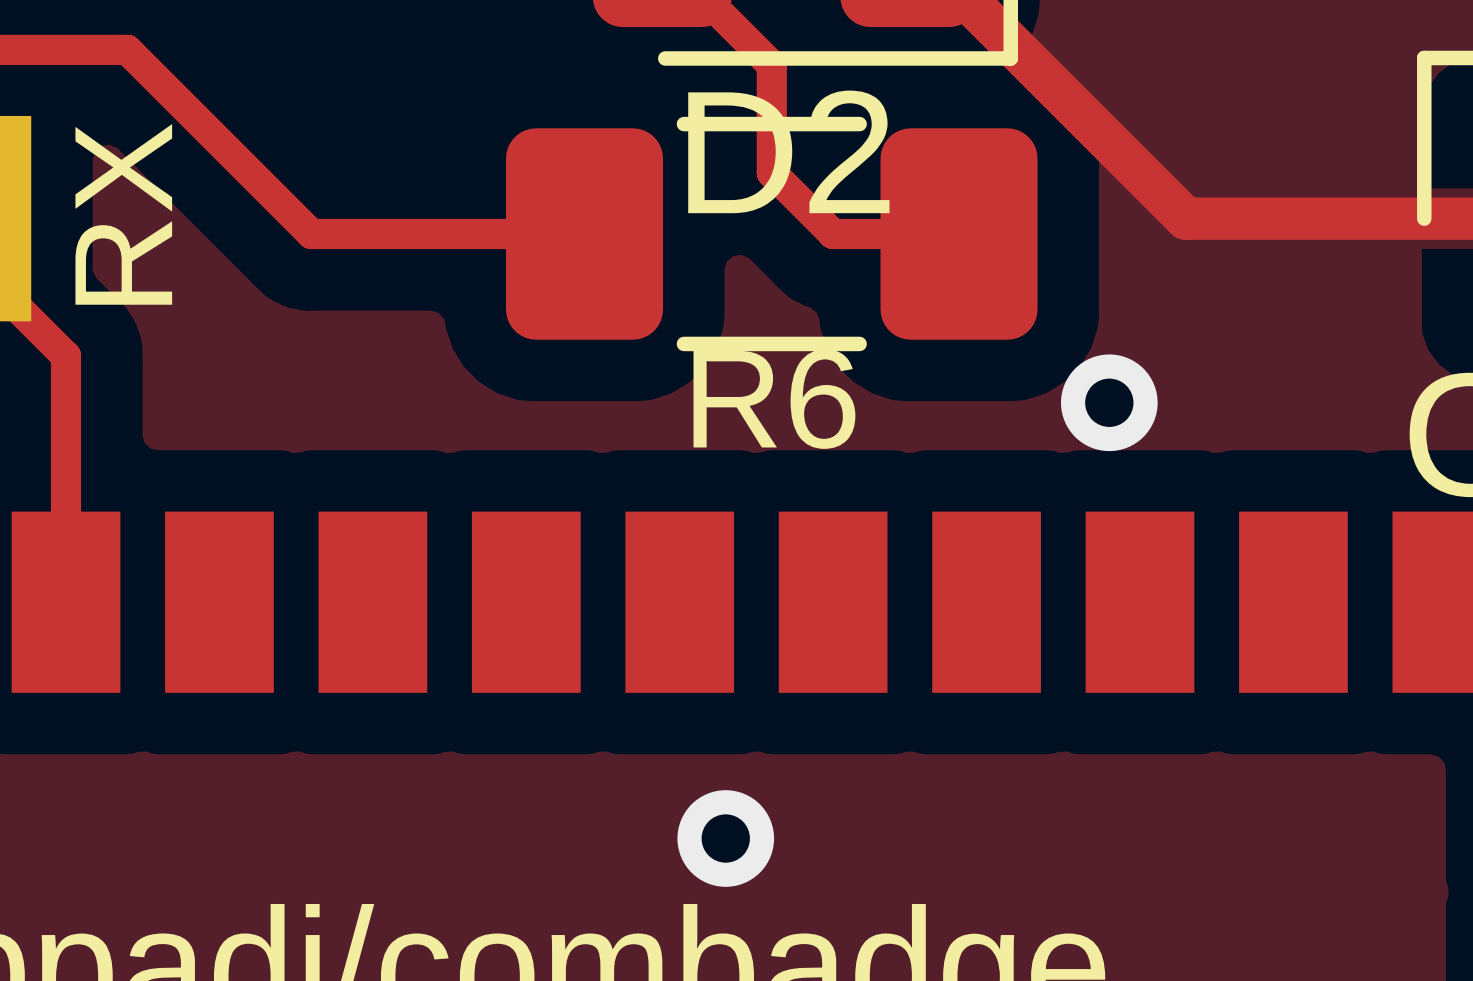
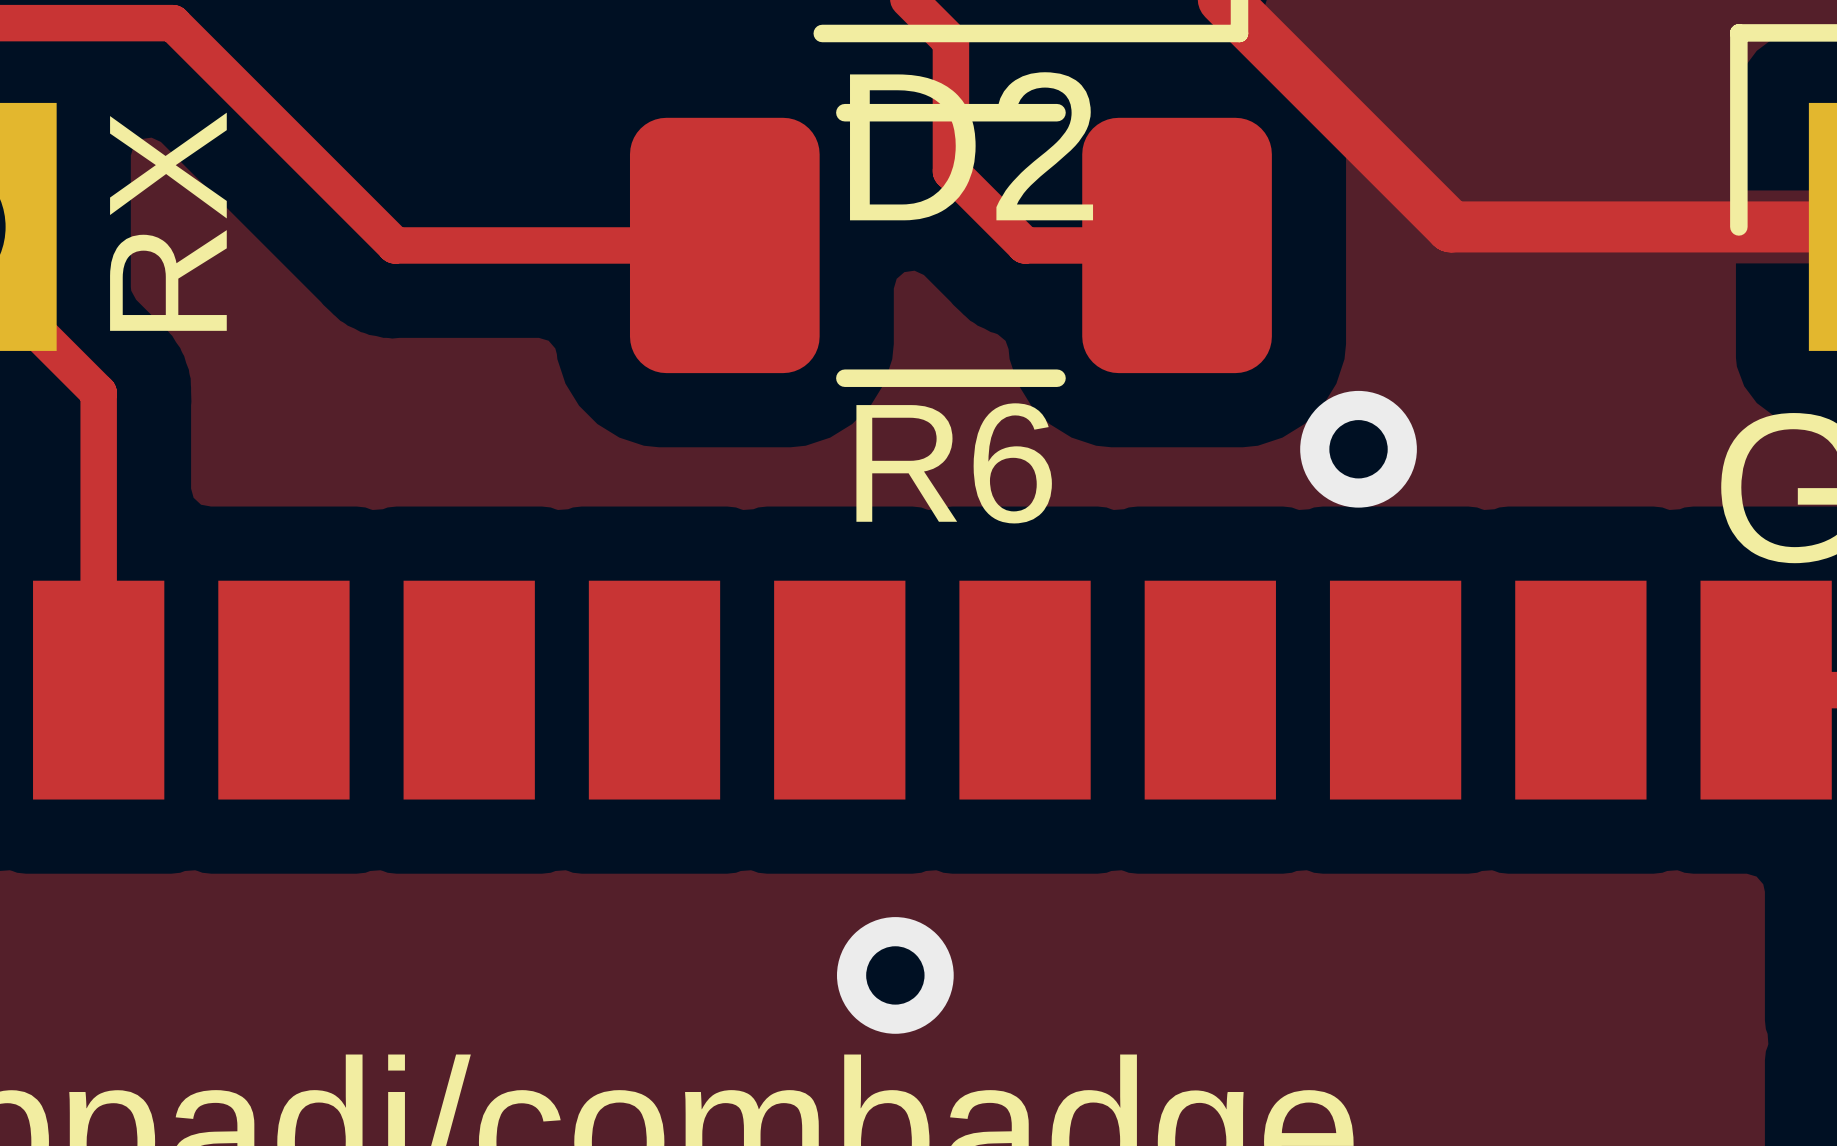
R6 name position: R6 (774, 399) -> R6 (954, 463)

